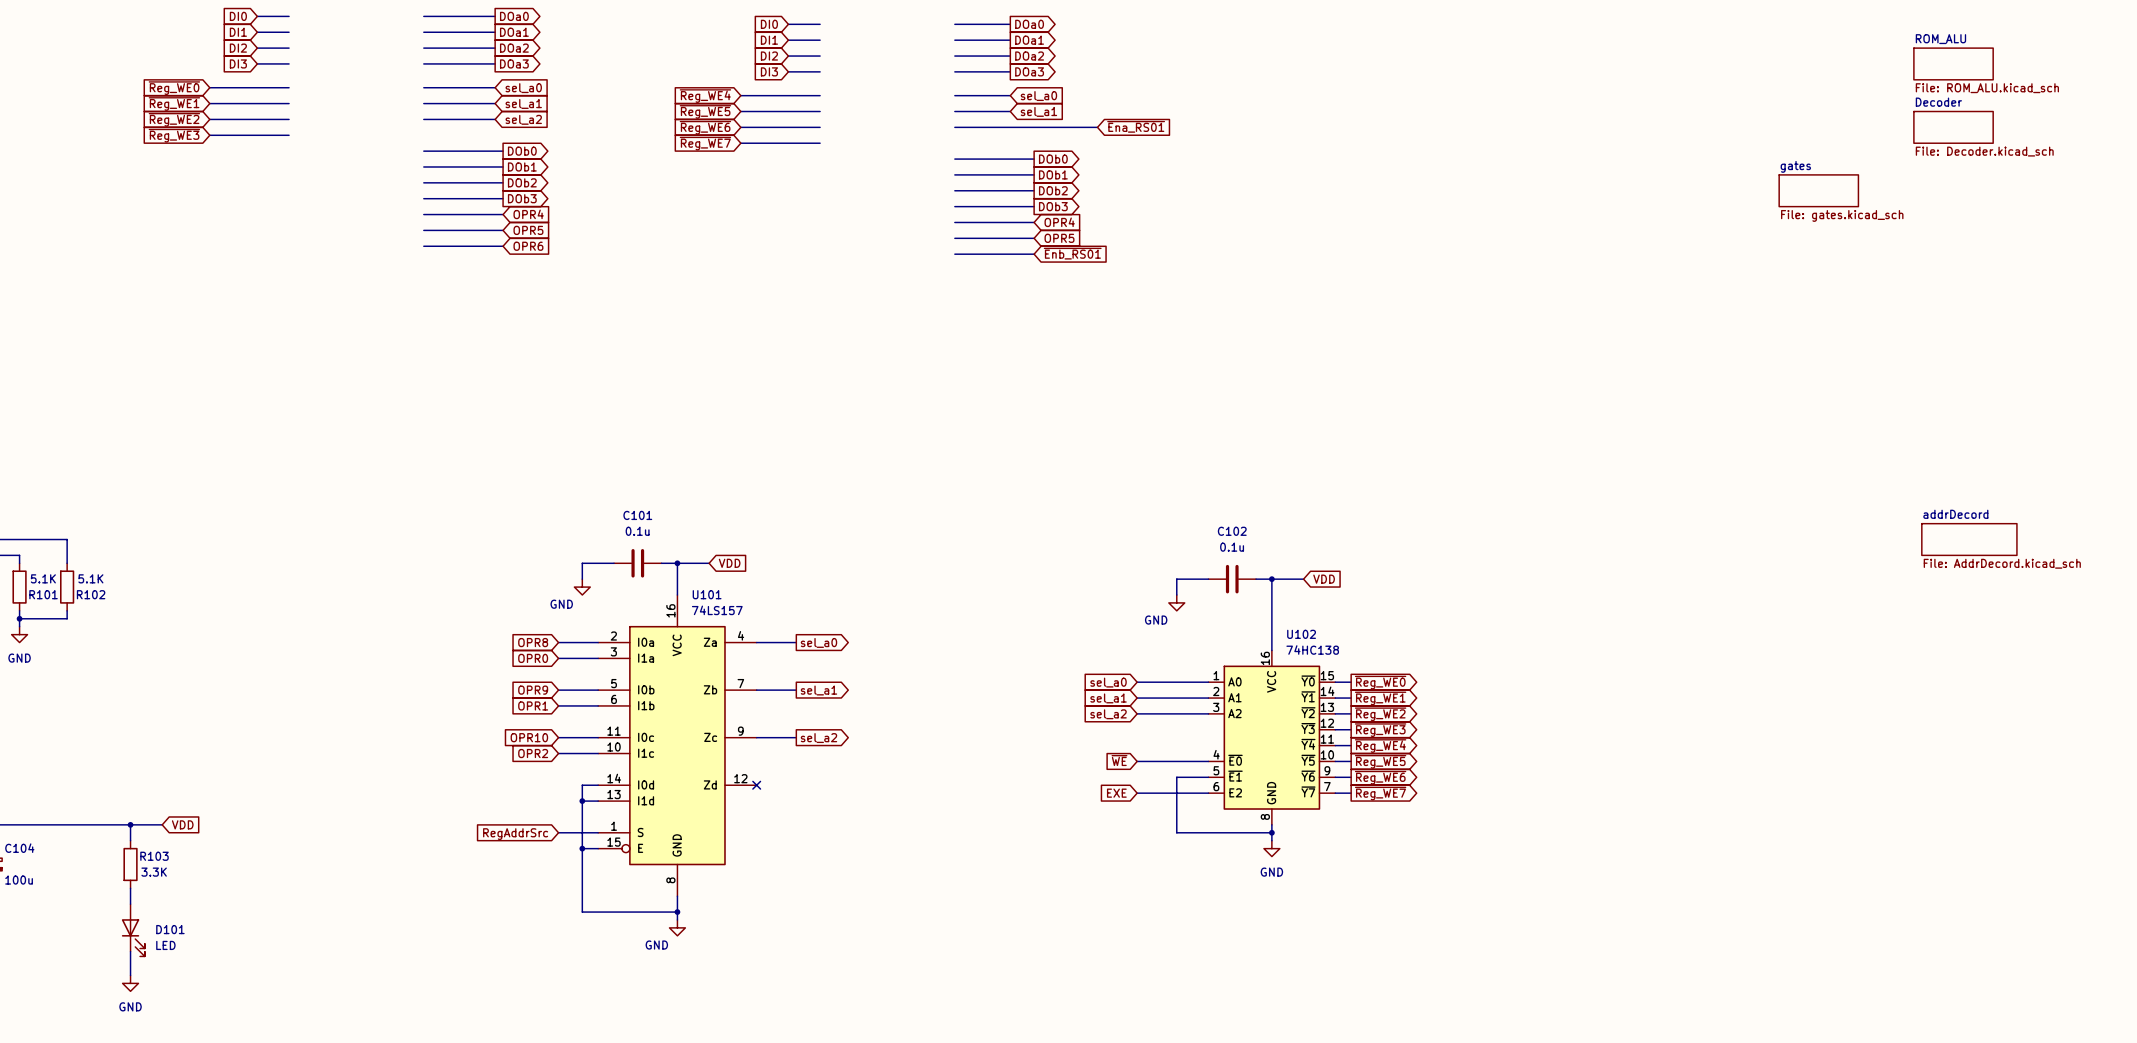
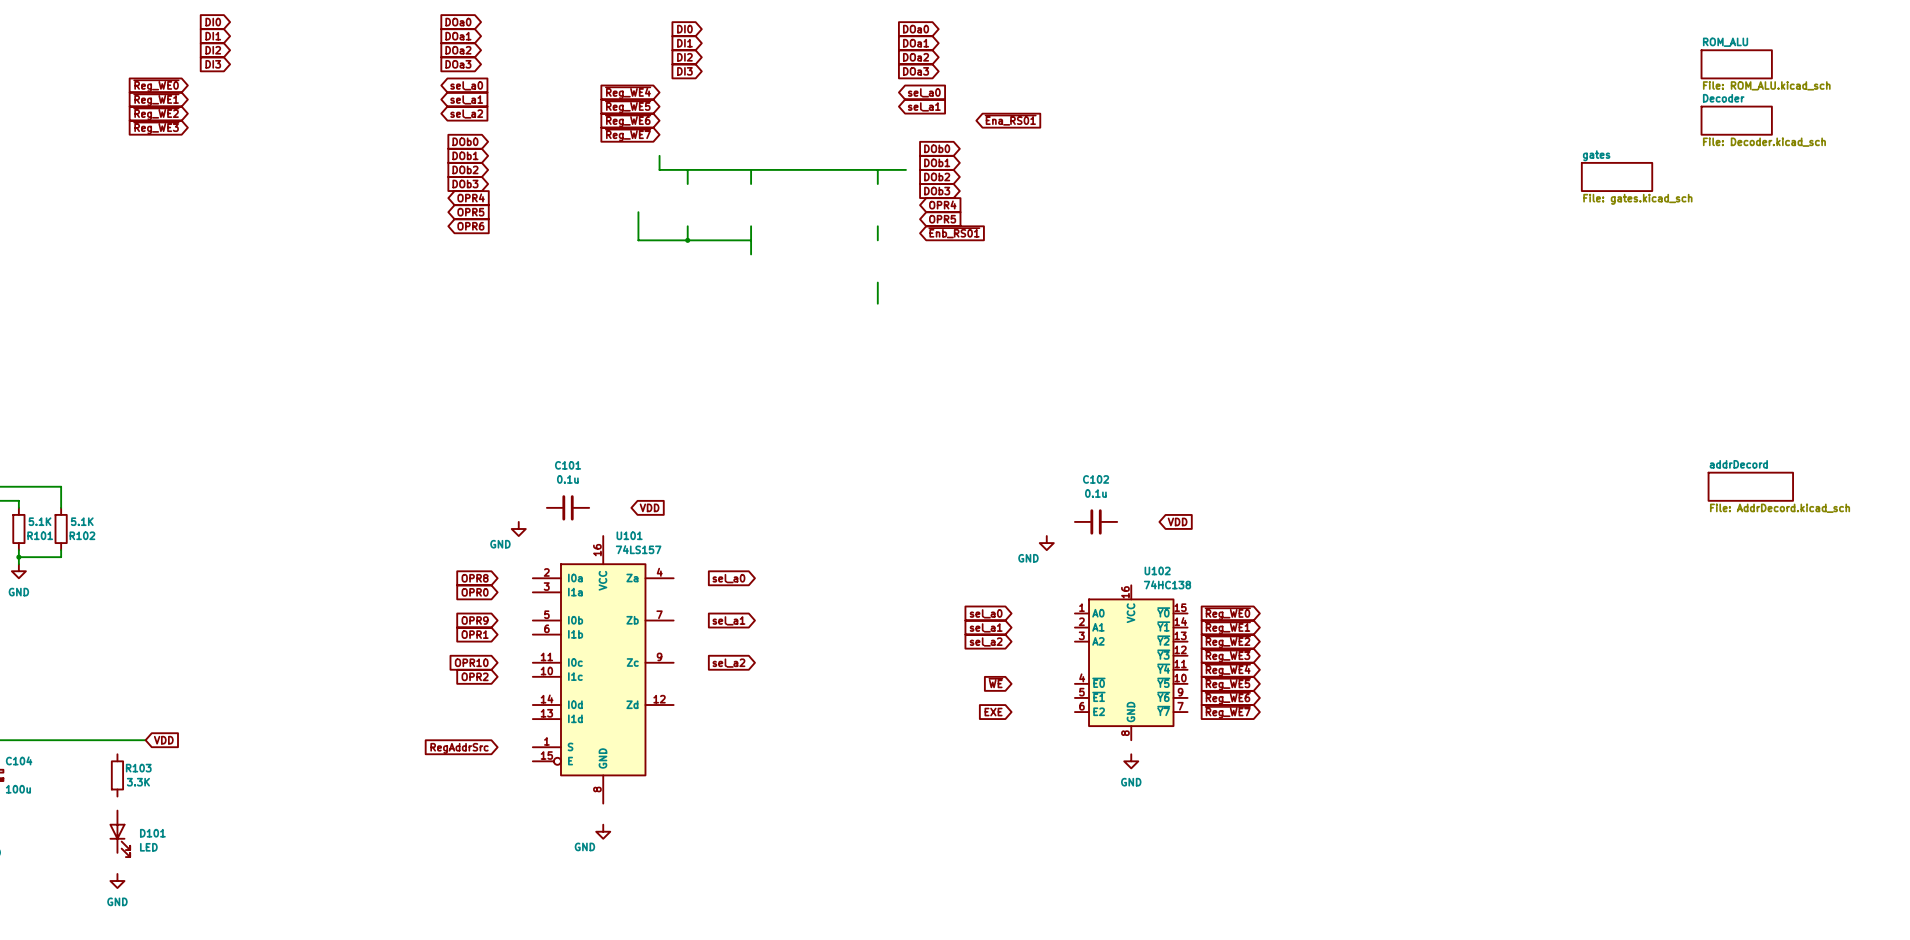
wire: (257, 16) (289, 16) -> none
wire: (423, 16) (495, 16) -> none
wire: (788, 24) (820, 24) -> none
wire: (954, 24) (1010, 24) -> none
wire: (257, 32) (289, 32) -> none
wire: (423, 32) (495, 32) -> none
wire: (788, 40) (820, 40) -> none
wire: (954, 40) (1010, 40) -> none
wire: (257, 48) (289, 48) -> none
wire: (423, 48) (495, 48) -> none
wire: (788, 56) (820, 56) -> none
wire: (954, 56) (1010, 56) -> none
wire: (257, 63) (289, 63) -> none
wire: (423, 63) (495, 63) -> none
wire: (788, 71) (820, 71) -> none
wire: (954, 71) (1010, 71) -> none
wire: (209, 87) (289, 87) -> none
wire: (423, 87) (495, 87) -> none
wire: (740, 95) (820, 95) -> none
wire: (954, 95) (1010, 95) -> none
wire: (209, 103) (289, 103) -> none
wire: (423, 103) (495, 103) -> none
wire: (740, 111) (820, 111) -> none
wire: (954, 111) (1010, 111) -> none
wire: (209, 119) (289, 119) -> none
wire: (423, 119) (495, 119) -> none
wire: (740, 127) (820, 127) -> none
wire: (954, 127) (1097, 127) -> none
wire: (209, 135) (289, 135) -> none
wire: (740, 143) (820, 143) -> none
wire: (423, 151) (503, 151) -> none
wire: (954, 159) (1034, 159) -> none
wire: (423, 166) (503, 166) -> none
wire: none -> (659, 155) (659, 169) (905, 169)
wire: (954, 174) (1034, 174) -> none
wire: (423, 182) (503, 182) -> none
wire: none -> (687, 169) (687, 184)
wire: none -> (751, 169) (751, 184)
wire: none -> (877, 169) (877, 184)
wire: (954, 190) (1034, 190) -> none
wire: (423, 198) (503, 198) -> none
wire: (954, 206) (1034, 206) -> none
wire: (423, 214) (503, 214) -> none
wire: (954, 222) (1034, 222) -> none
wire: (423, 230) (503, 230) -> none
wire: none -> (638, 212) (638, 240) (751, 240)
wire: (954, 238) (1034, 238) -> none
wire: (423, 246) (503, 246) -> none
wire: none -> (687, 226) (687, 240)
wire: none -> (751, 226) (751, 254)
wire: none -> (877, 226) (877, 240)
wire: (954, 254) (1034, 254) -> none
junction: none -> (687, 240)
wire: none -> (877, 282) (877, 303)
wire: (614, 563) (582, 563) (582, 579) -> none
wire: (661, 563) (709, 563) -> none
wire: (677, 563) (677, 595) -> none
junction: (677, 563) -> none
wire: (1208, 579) (1176, 579) (1176, 595) -> none
wire: (1256, 579) (1303, 579) -> none
wire: (1271, 579) (1271, 650) -> none
junction: (1271, 579) -> none
wire: (558, 642) (598, 642) -> none
wire: (756, 642) (796, 642) -> none
wire: (558, 658) (598, 658) -> none
wire: (1137, 682) (1208, 682) -> none
wire: (1335, 682) (1351, 682) -> none
wire: (558, 690) (598, 690) -> none
wire: (756, 690) (796, 690) -> none
wire: (1137, 698) (1208, 698) -> none
wire: (1335, 698) (1351, 698) -> none
wire: (558, 705) (598, 705) -> none
wire: (1137, 713) (1208, 713) -> none
wire: (1335, 713) (1351, 713) -> none
wire: (1335, 729) (1351, 729) -> none
wire: (558, 737) (598, 737) -> none
wire: (756, 737) (796, 737) -> none
wire: (1335, 745) (1351, 745) -> none
wire: (558, 753) (598, 753) -> none
wire: (1137, 761) (1208, 761) -> none
wire: (1335, 761) (1351, 761) -> none
wire: (1208, 777) (1176, 777) (1176, 832) (1271, 832) -> none
wire: (1335, 777) (1351, 777) -> none
wire: (598, 785) (582, 785) (582, 912) (677, 912) -> none
no-connect mark: (756, 785) -> none
wire: (1137, 793) (1208, 793) -> none
wire: (1335, 793) (1351, 793) -> none
wire: (582, 801) (598, 801) -> none
junction: (582, 801) -> none
wire: (130, 824) (130, 840) -> none
junction: (130, 824) -> none
wire: (1271, 824) (1271, 840) -> none
wire: (558, 832) (598, 832) -> none
junction: (1271, 832) -> none
wire: (582, 848) (598, 848) -> none
junction: (582, 848) -> none
wire: (130, 888) (130, 904) -> none
wire: (677, 896) (677, 919) -> none
junction: (677, 912) -> none
wire: (130, 951) (130, 975) -> none

